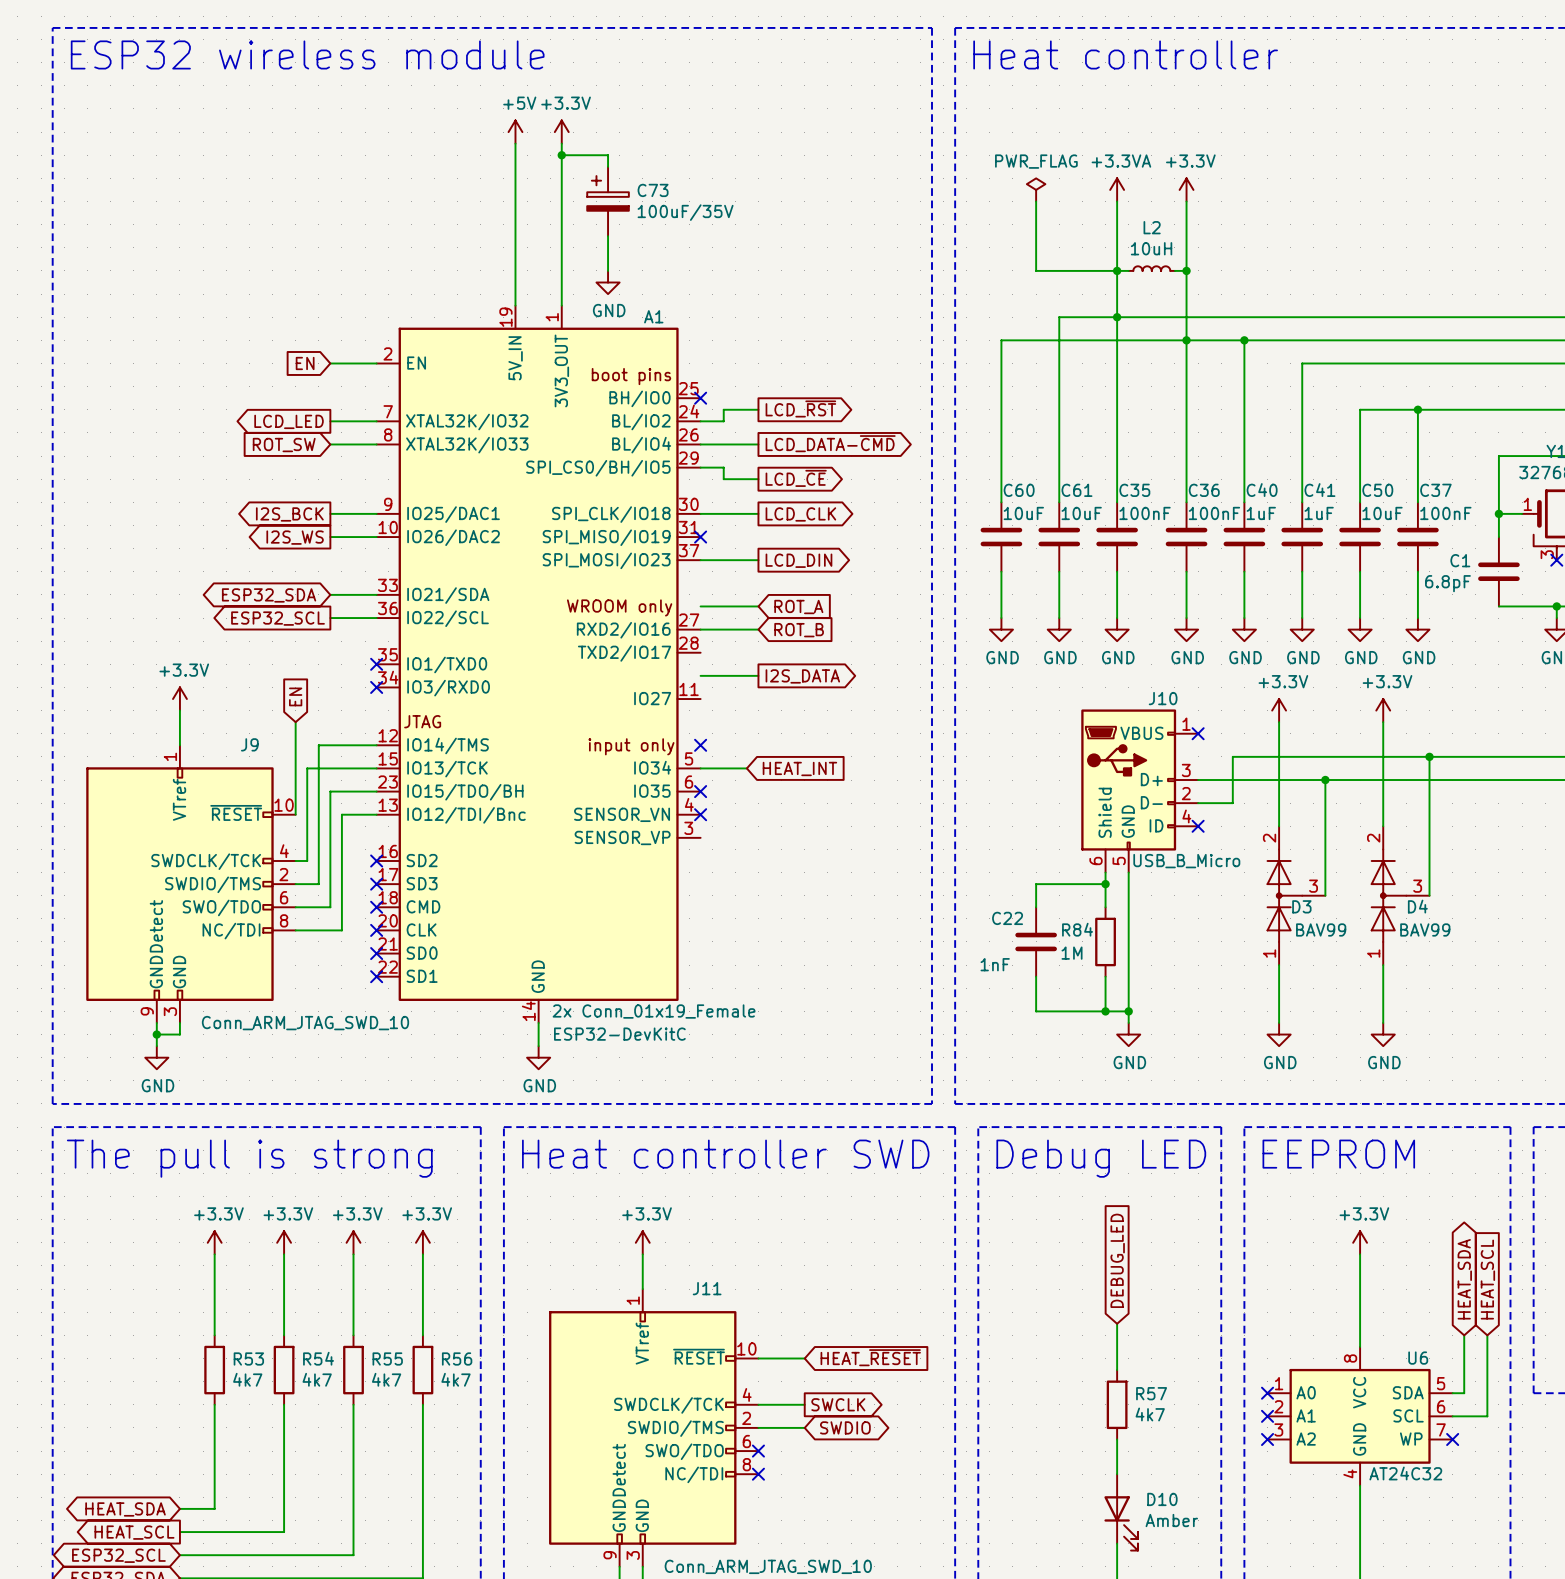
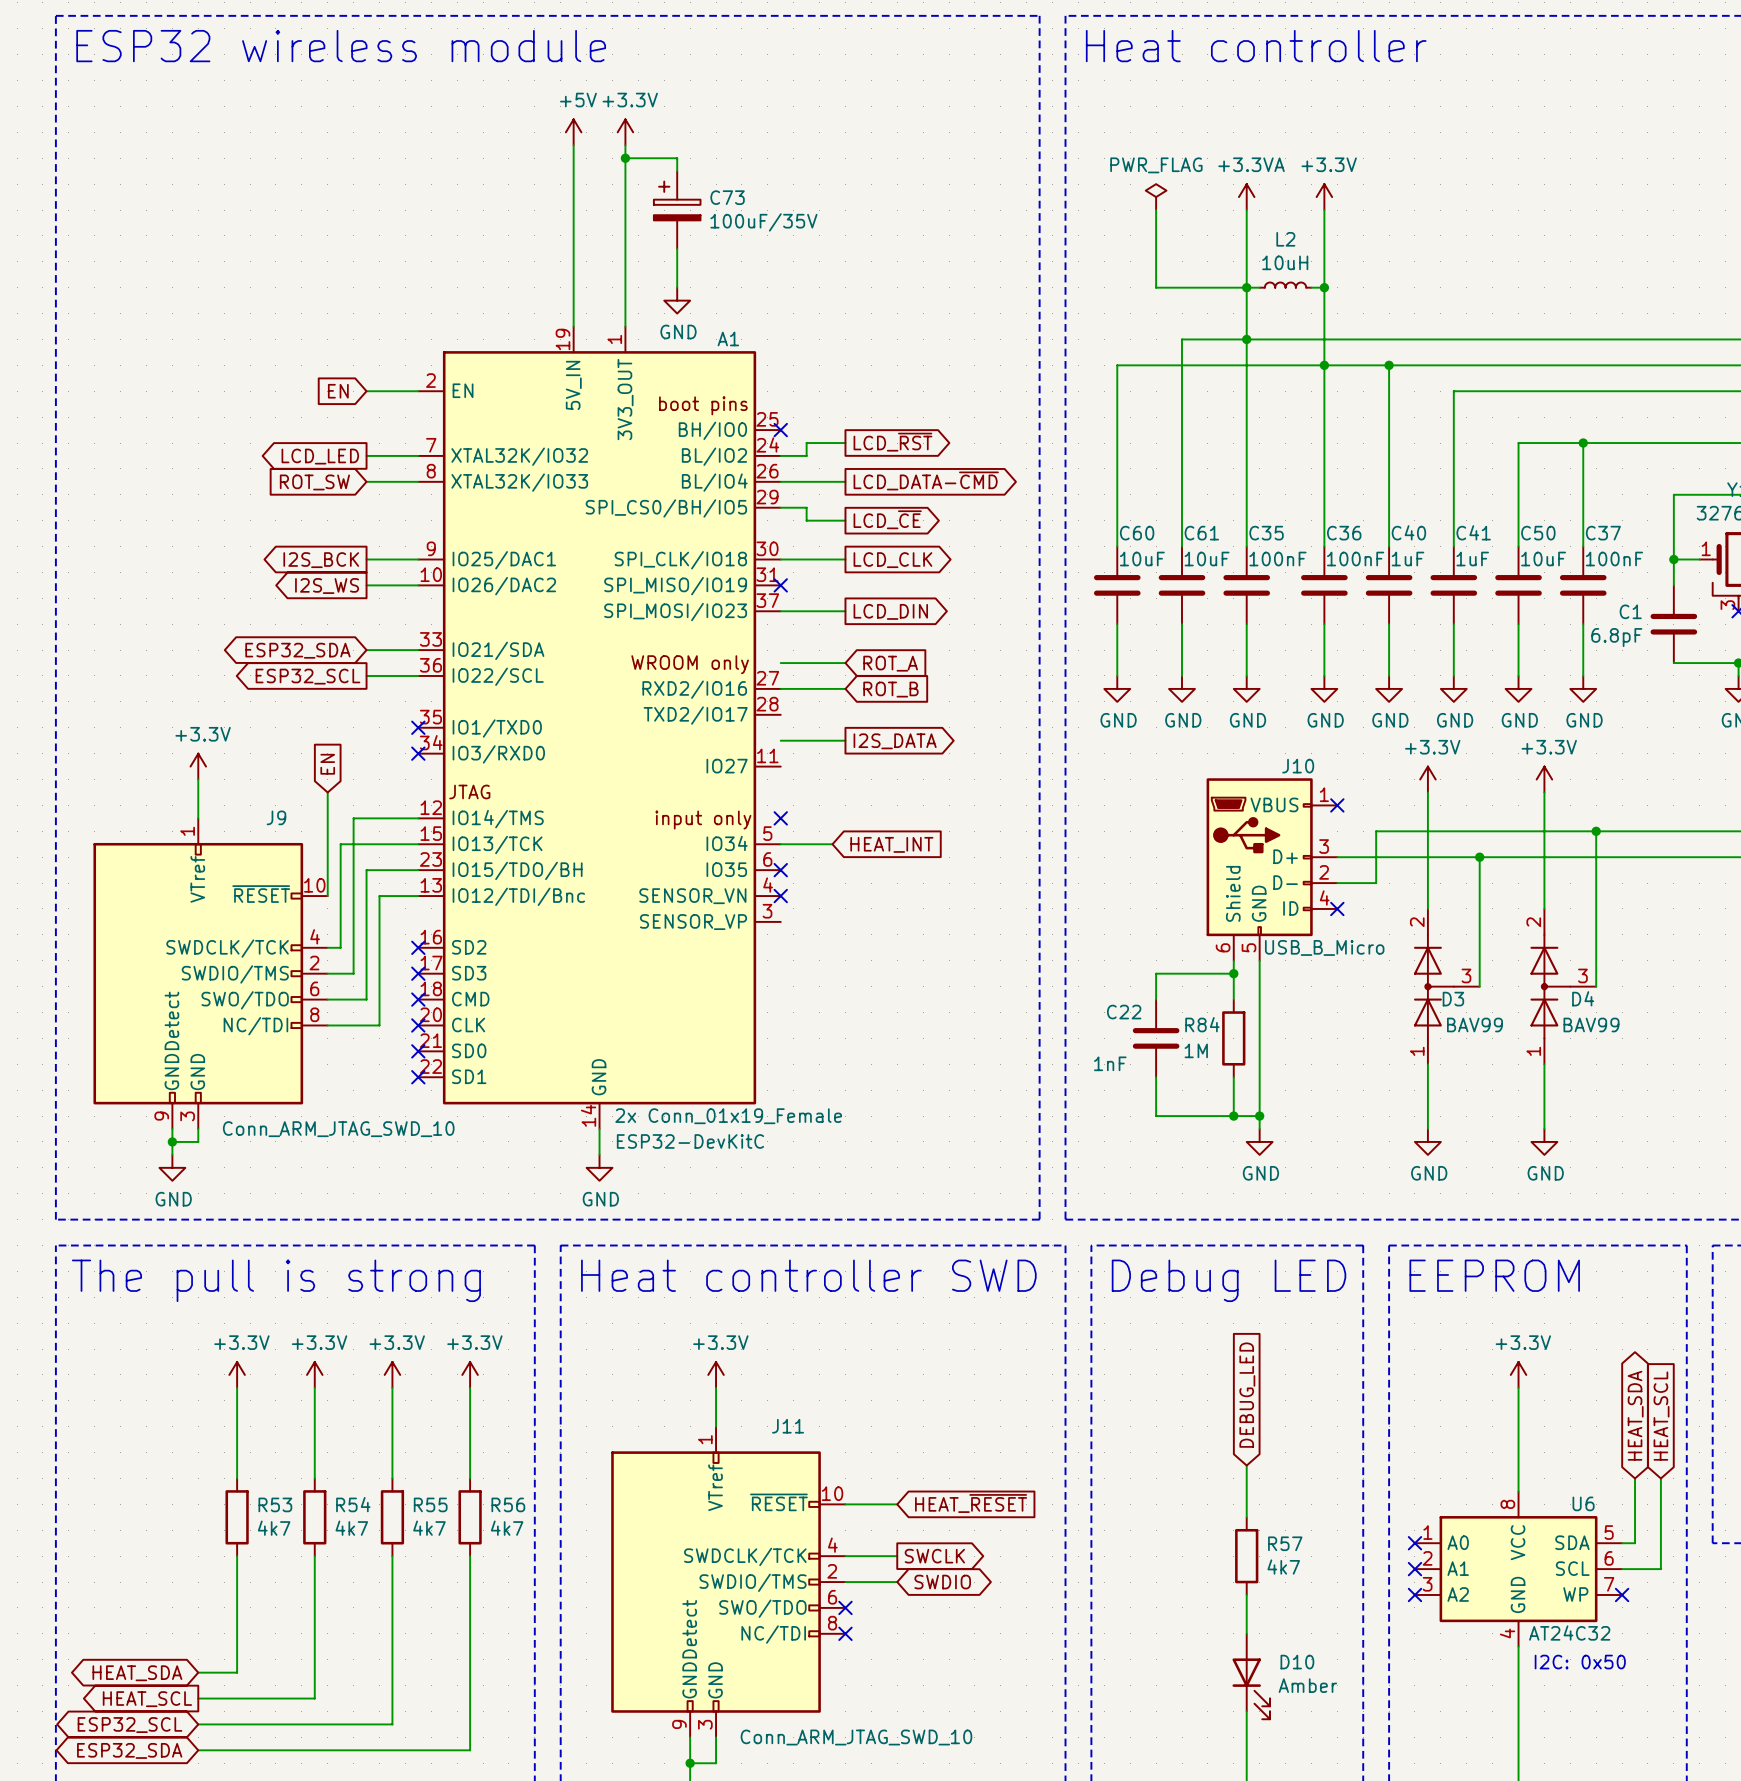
text: none -> I2C: 0x50 (1580, 1662)

